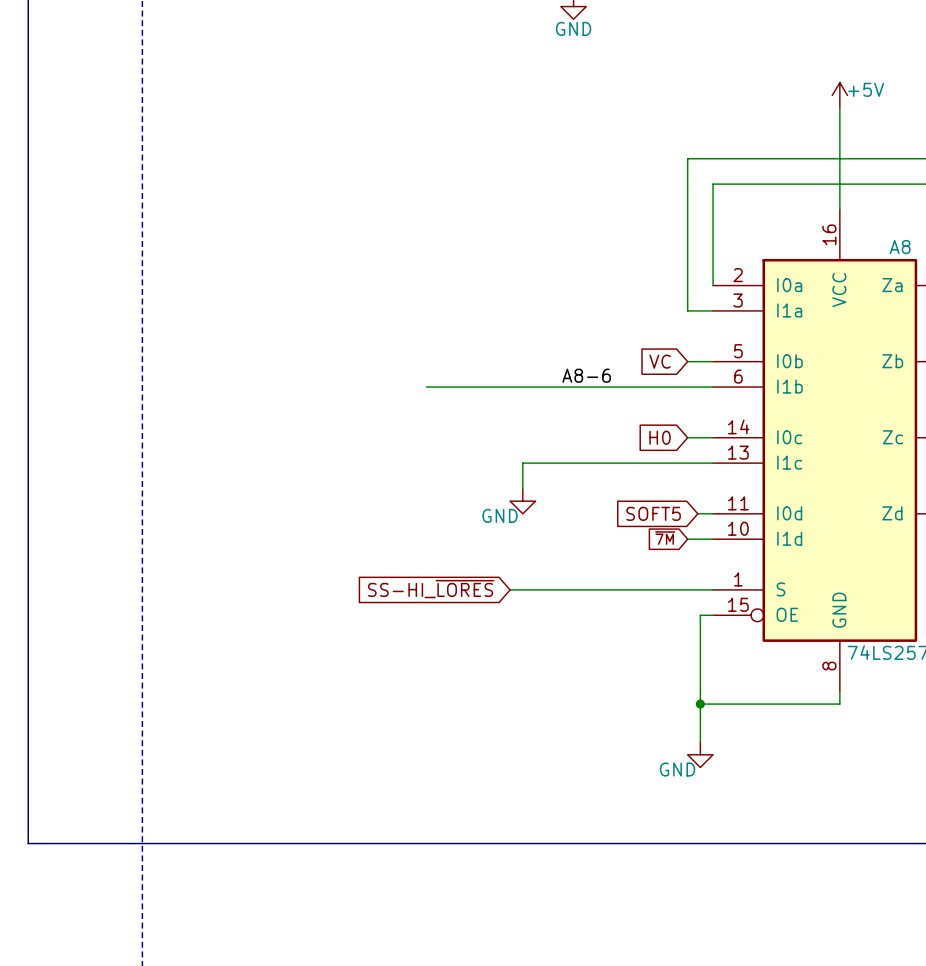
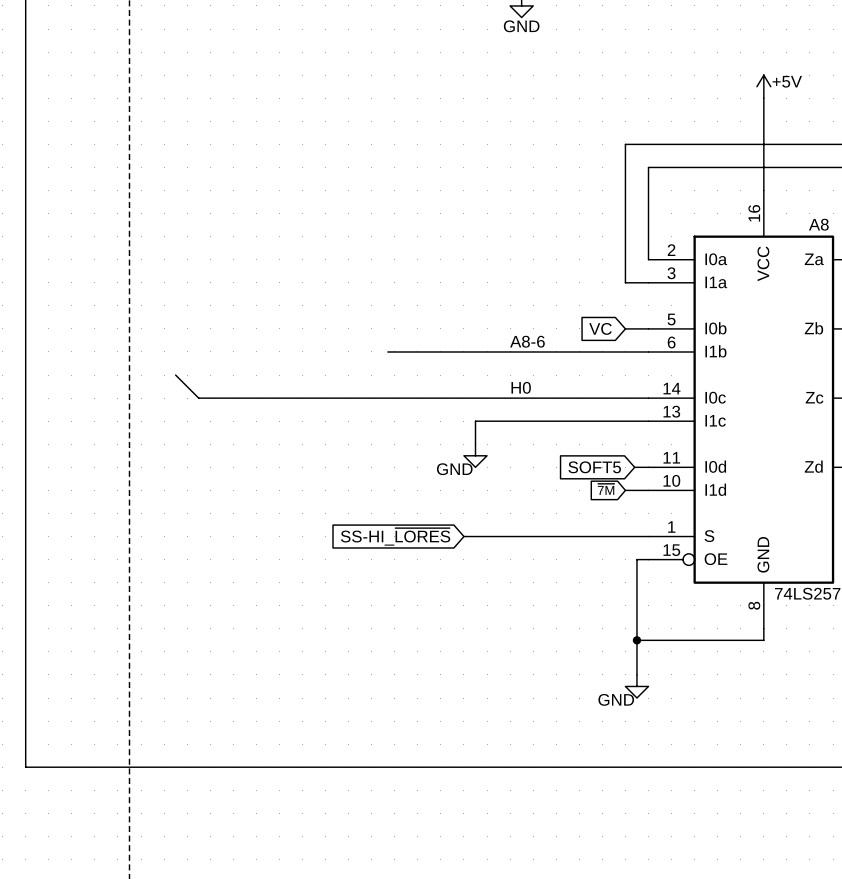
wire: none -> (175, 375) (198, 398) (625, 398)
label: none -> H0 (521, 387)
global label: H0 (660, 437) -> none

